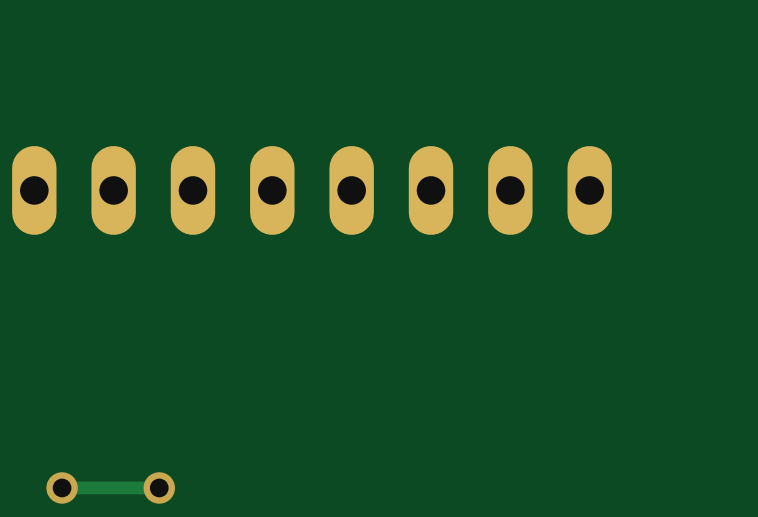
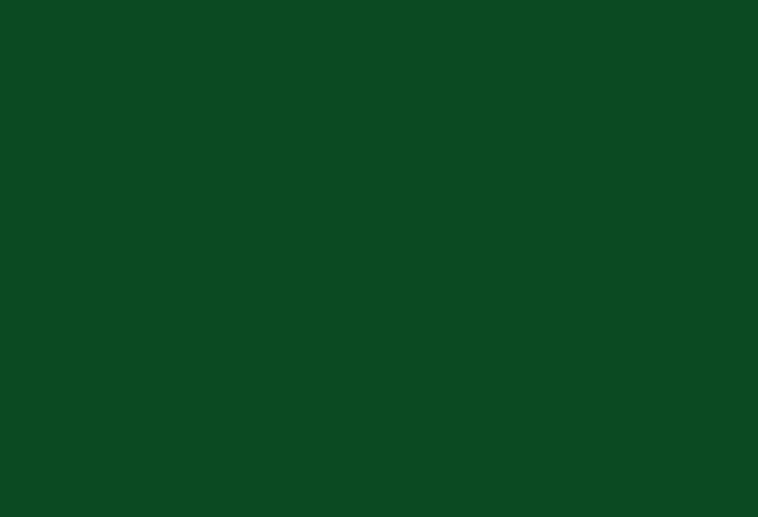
part: (311, 190) -> none
via: (62, 487) -> none
via: (159, 487) -> none
track: (161, 487) (62, 487) -> none

